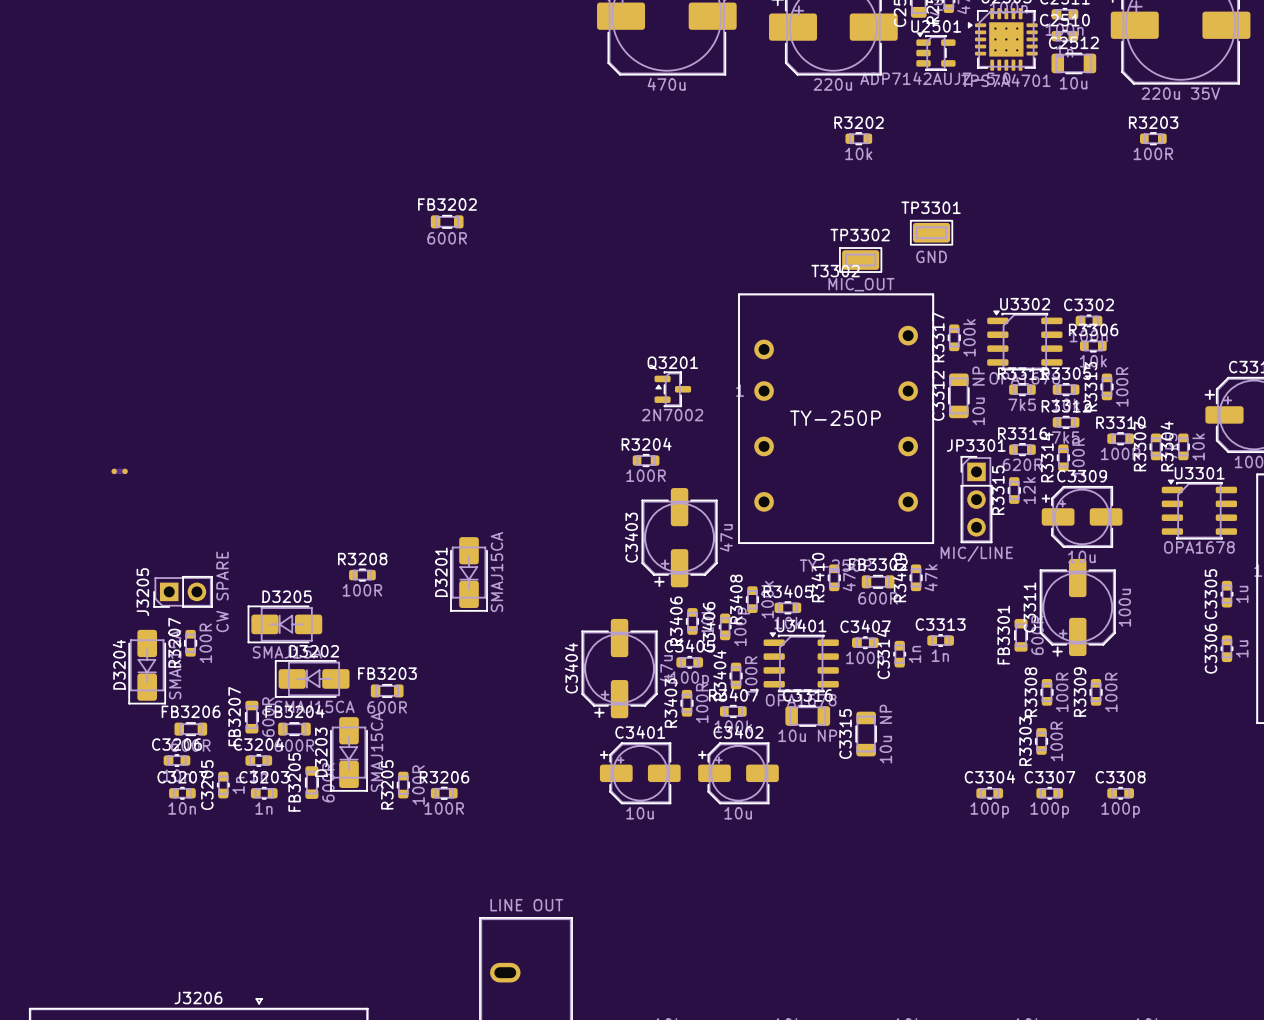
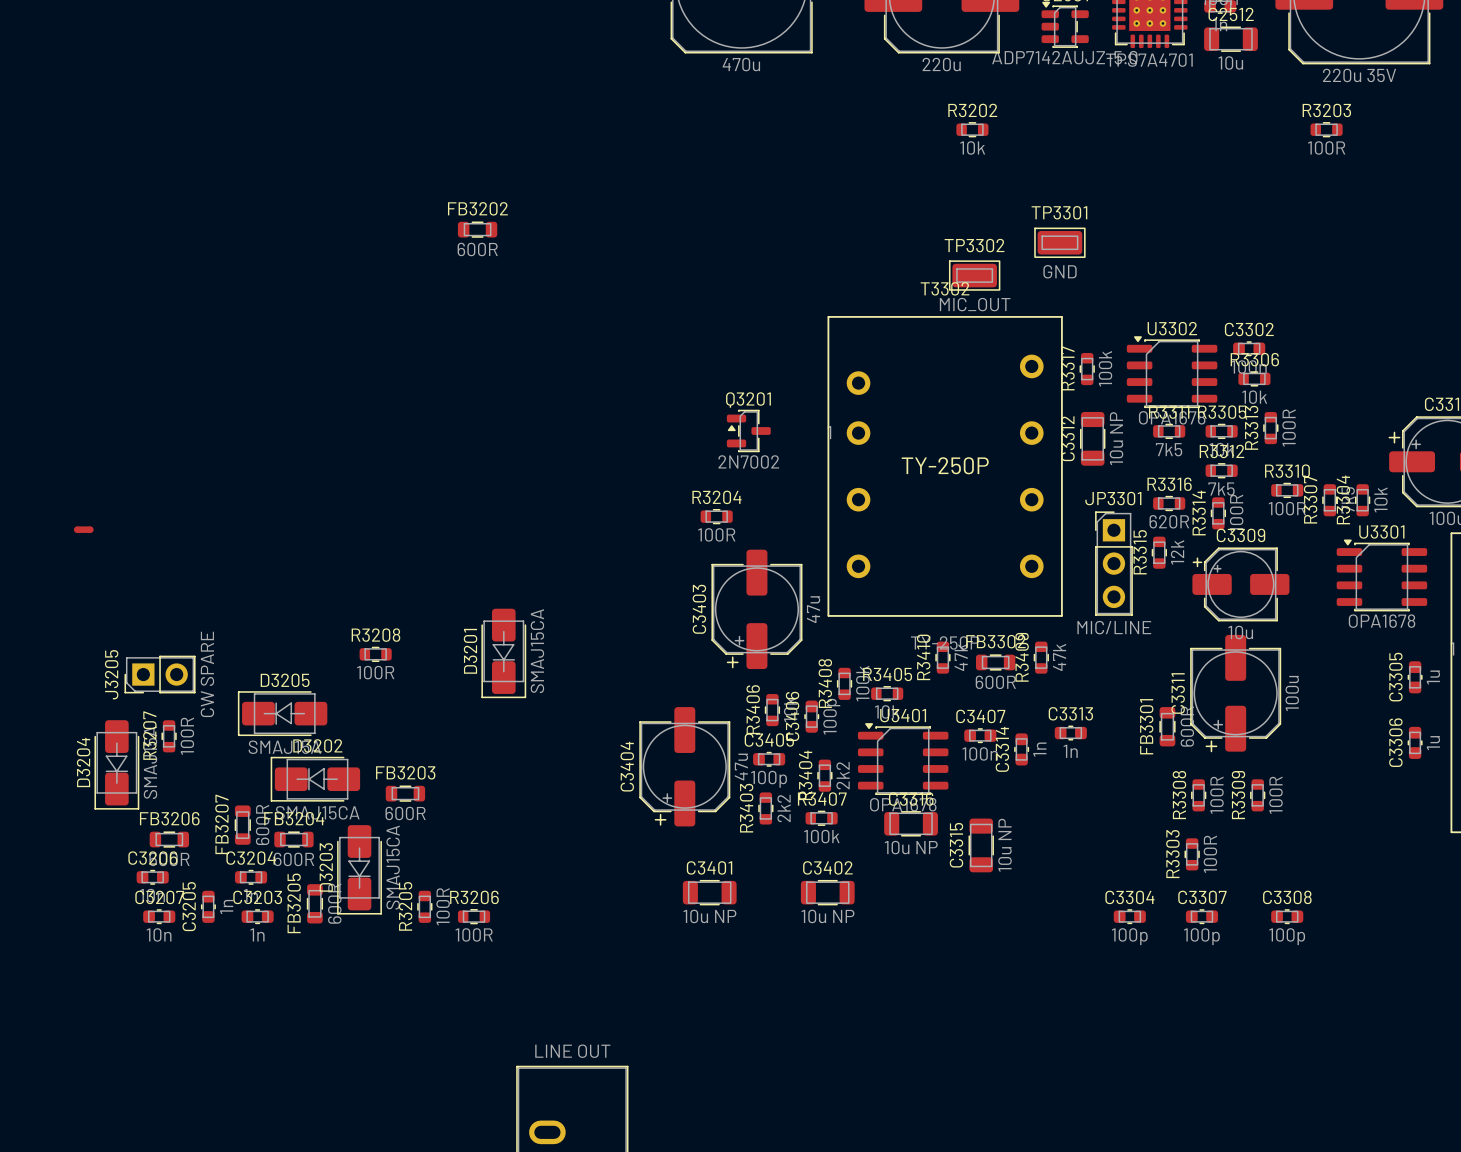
R3404 value: 100R (751, 675) -> 2k2 (843, 775)
R3403 value: 100R (702, 703) -> 2k2 (784, 808)
C3401 footprint: [599, 742, 681, 805] -> [682, 879, 737, 906]
C3402 footprint: [698, 742, 779, 805] -> [800, 879, 855, 906]
C3401 value: 10u (640, 813) -> 10u NP (709, 916)
C3402 value: 10u (738, 813) -> 10u NP (827, 916)

